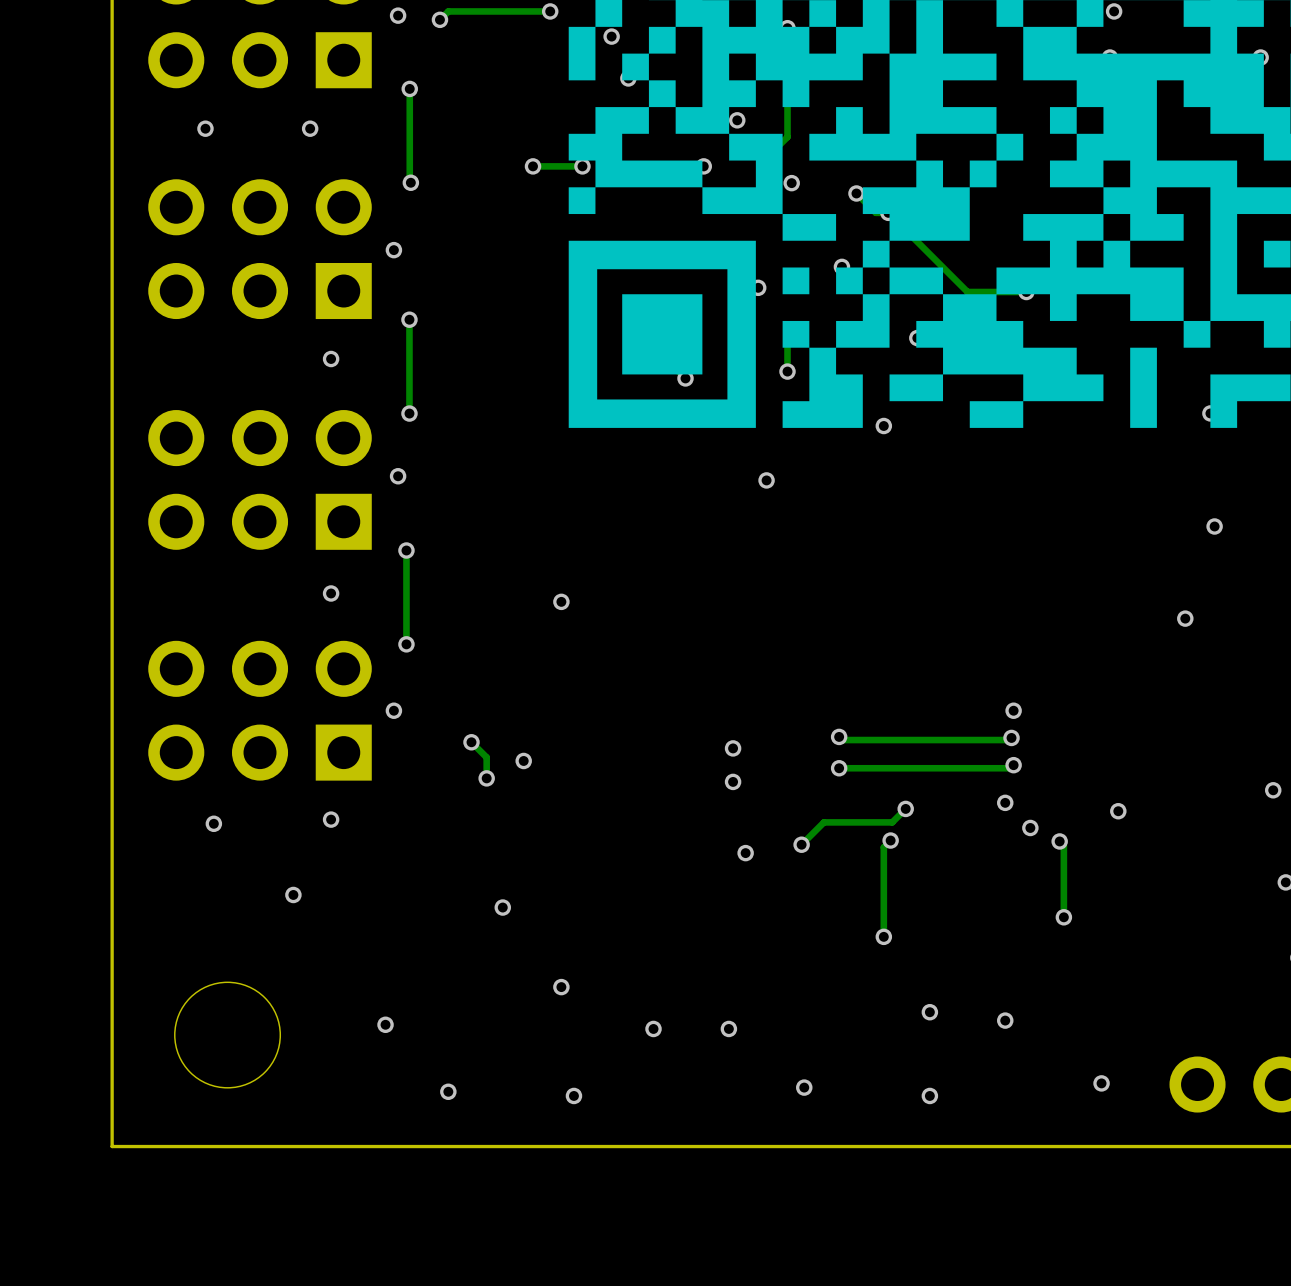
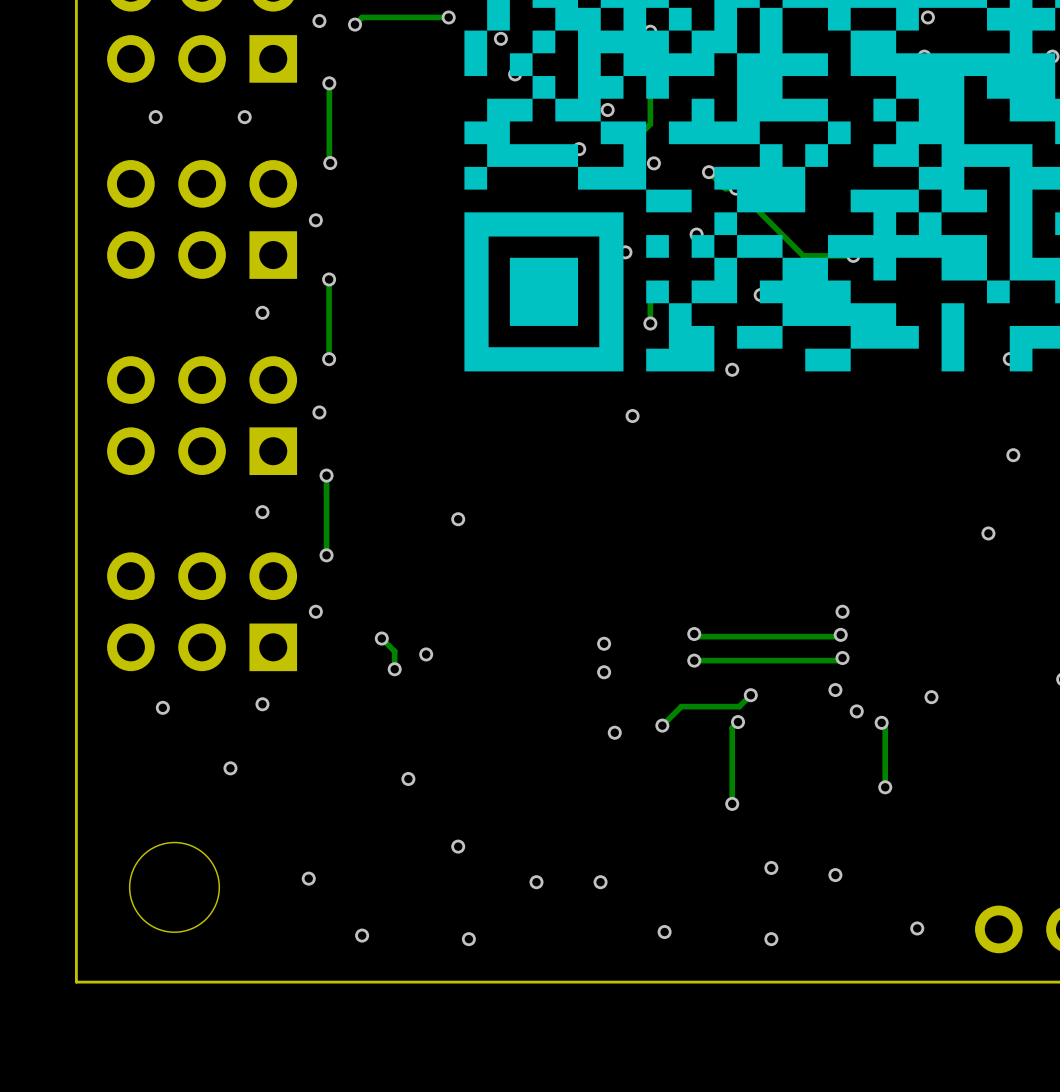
via: (533, 166) -> none
track: (582, 166) (533, 166) -> none
via: (582, 166) -> none
via: (685, 378) -> none

